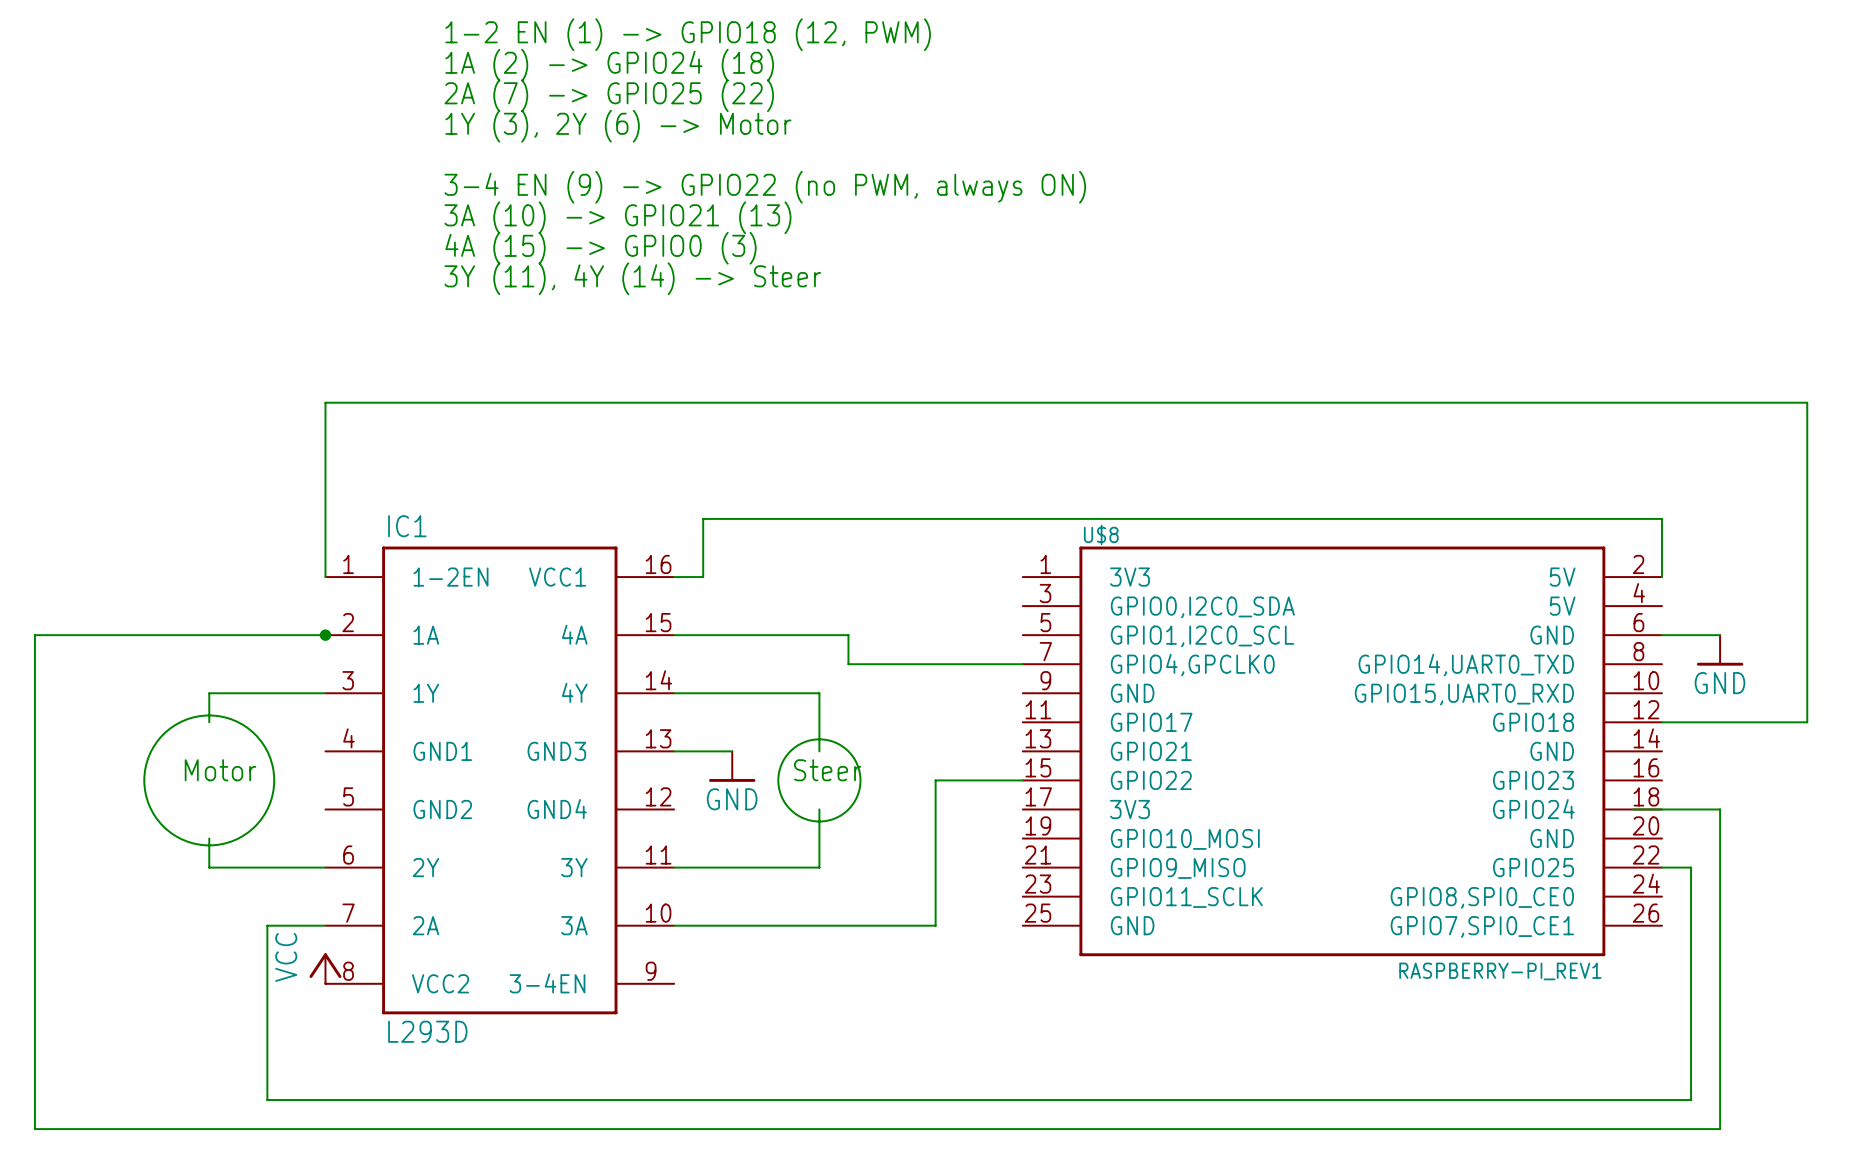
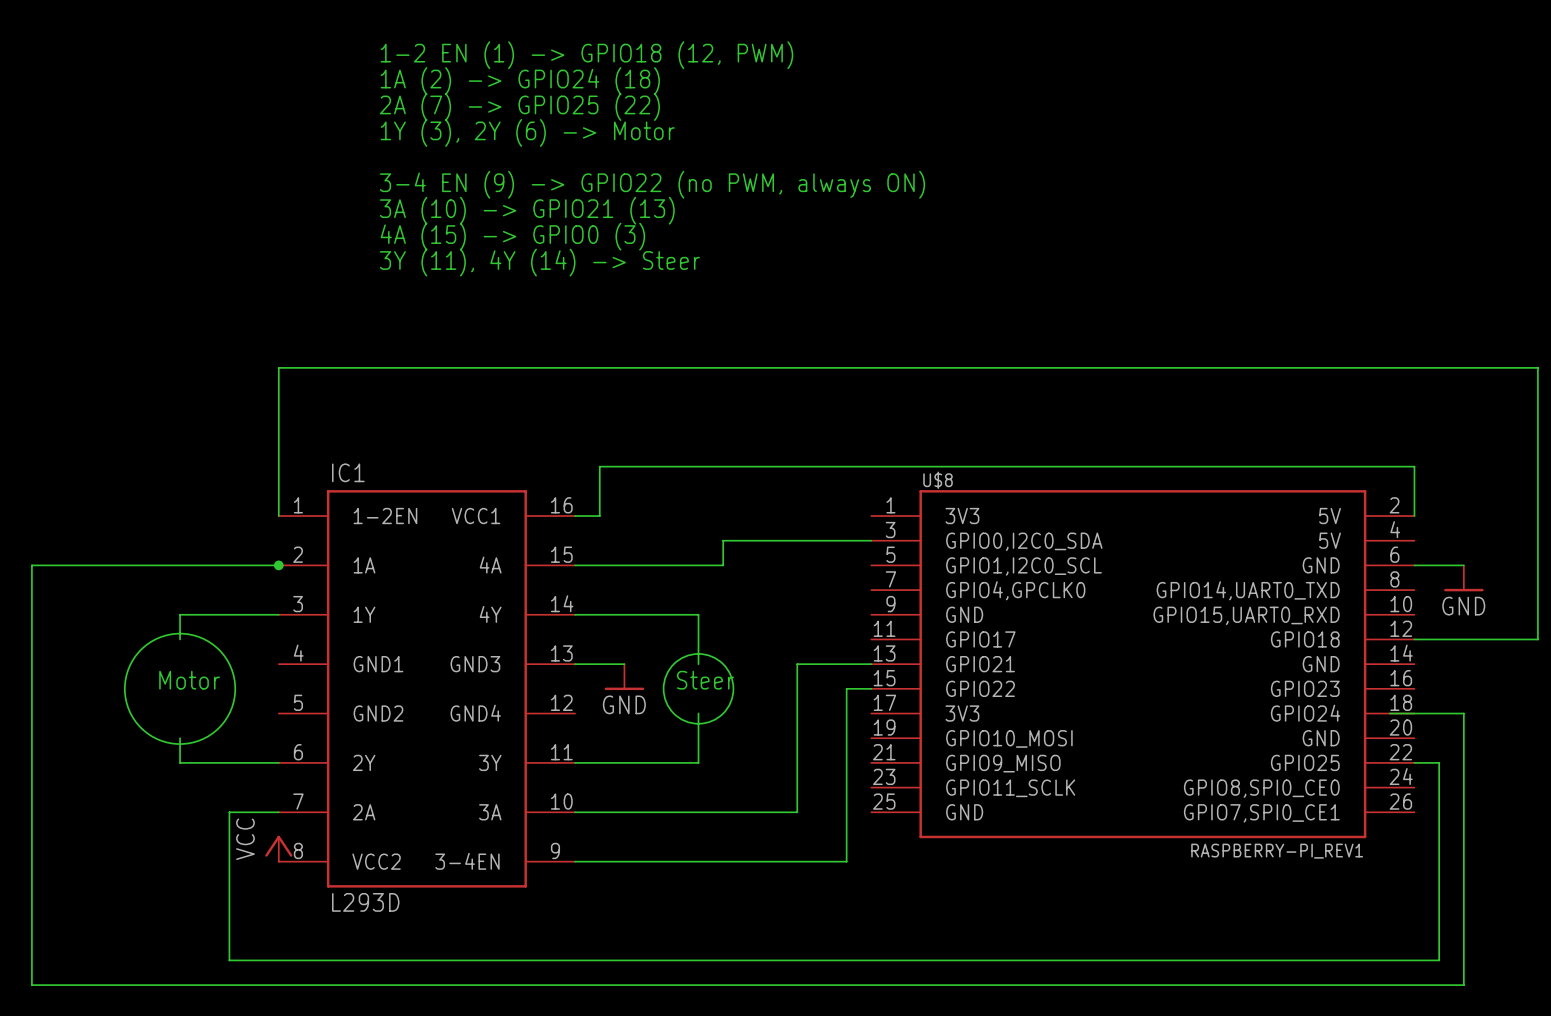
wire: (848, 635) (848, 664) (1022, 664) -> (723, 565) (723, 540) (871, 540)
wire: (935, 780) (993, 780) -> (797, 688) (797, 664) (871, 664)
wire: none -> (846, 688) (846, 861) (575, 861)

